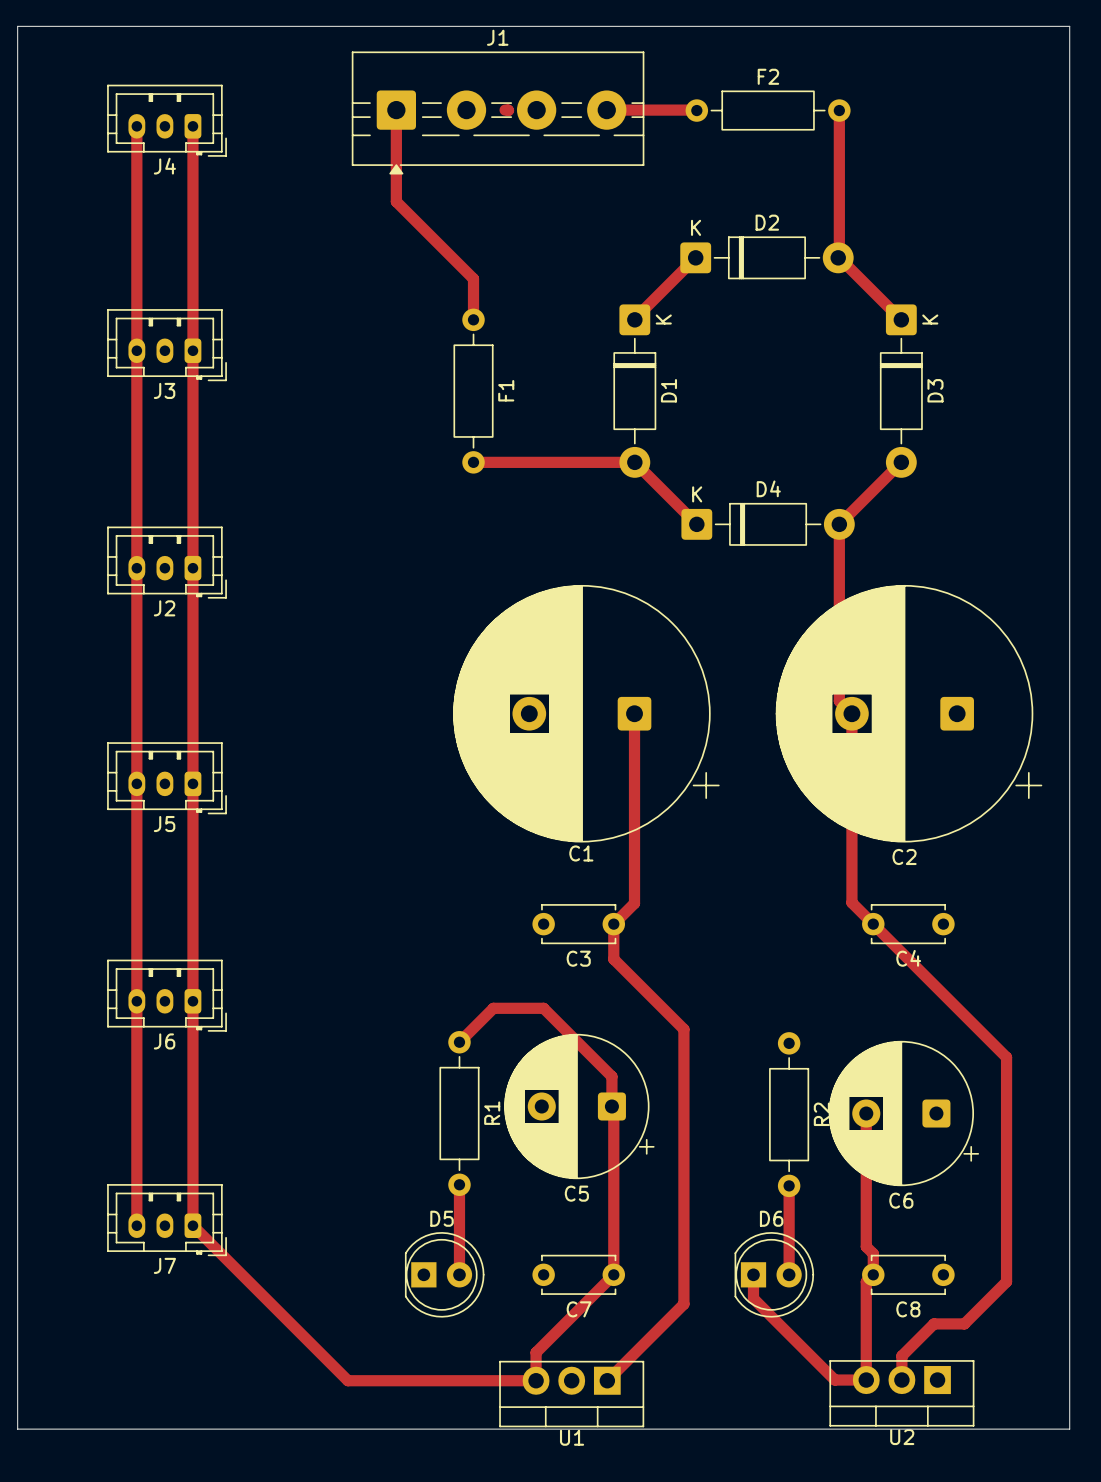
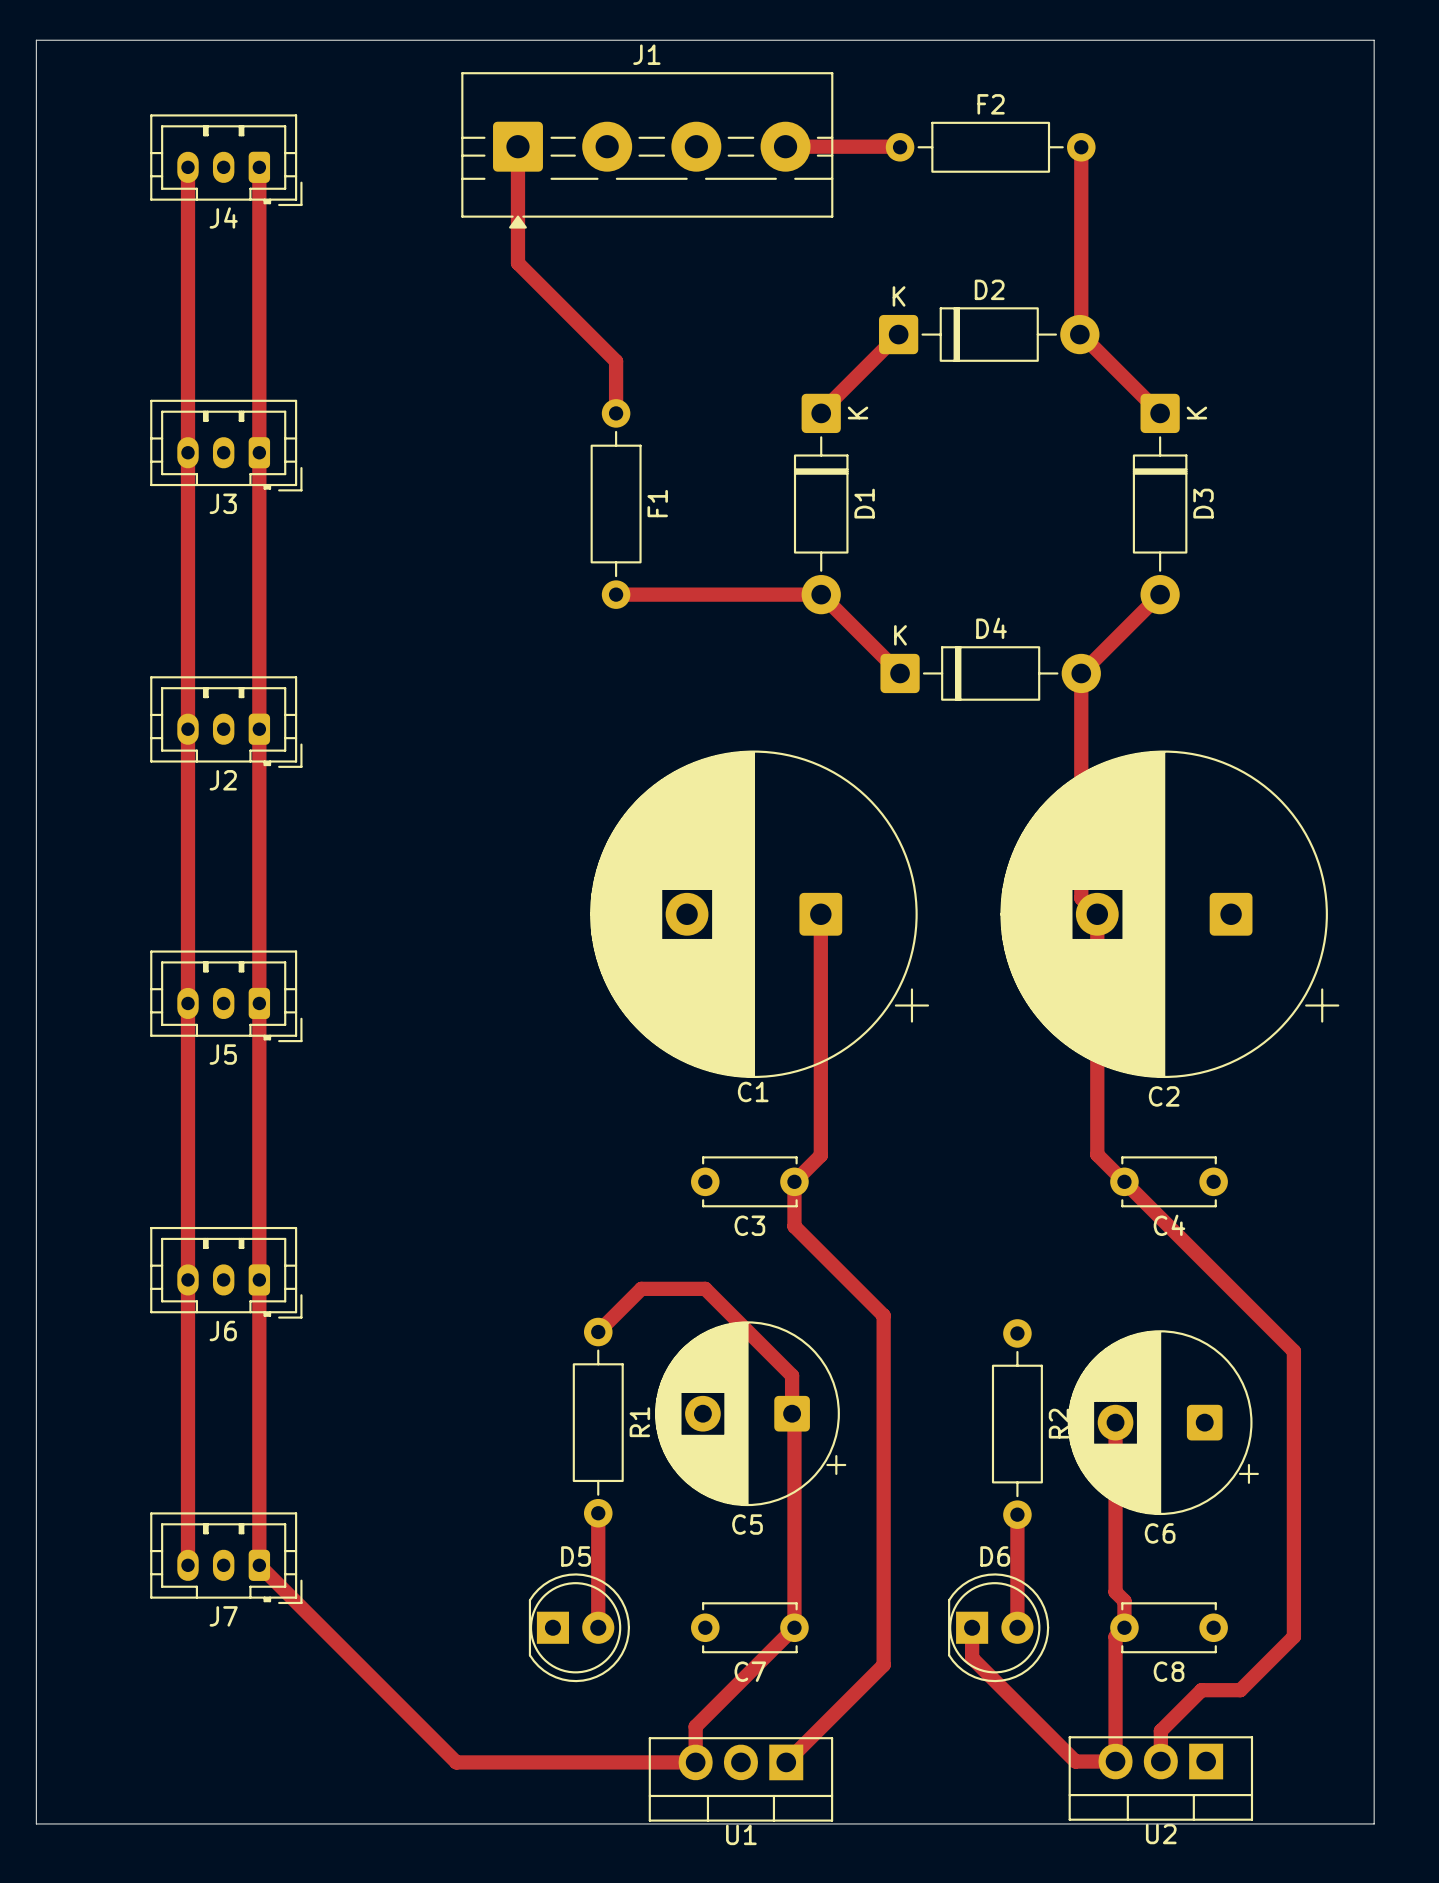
track: (505, 110) (508, 110) -> none

